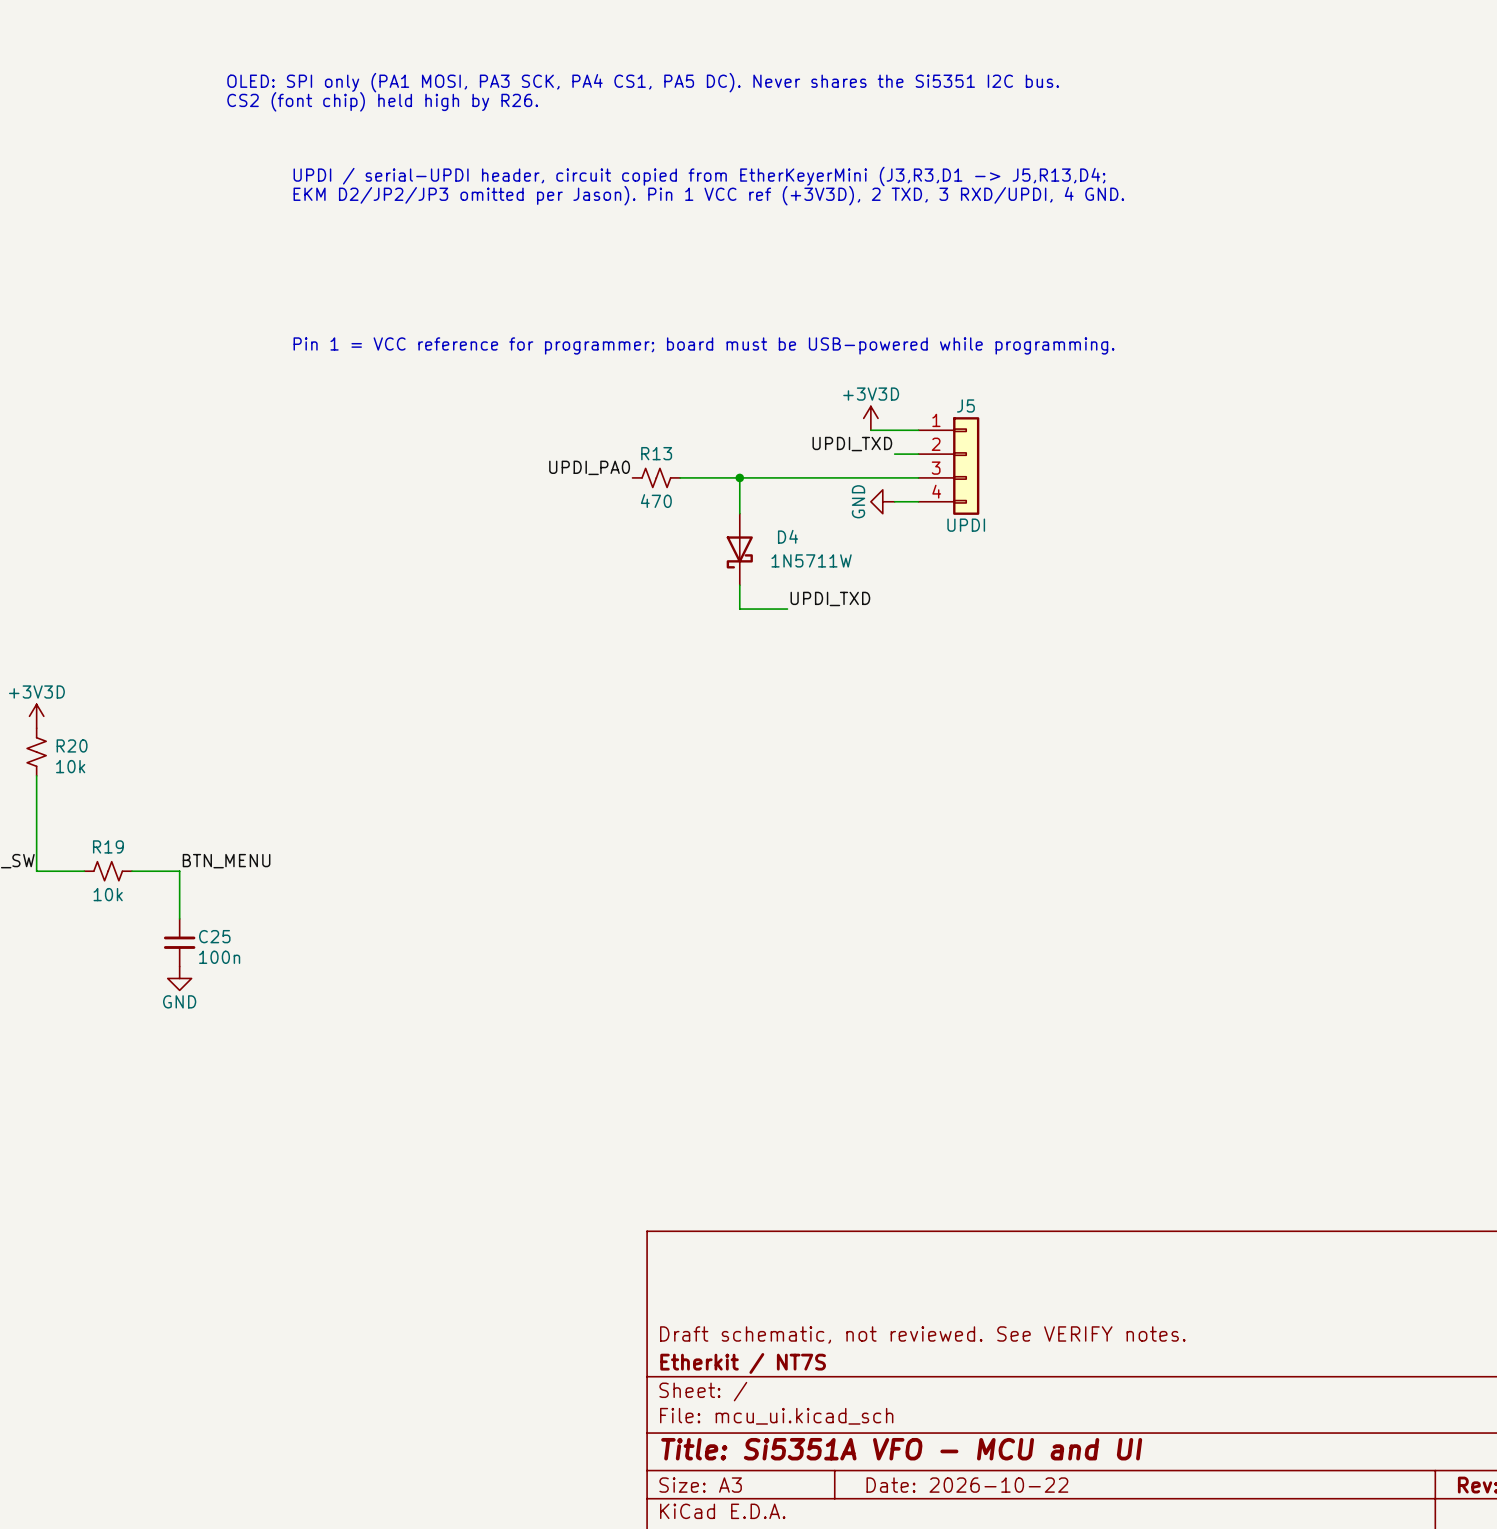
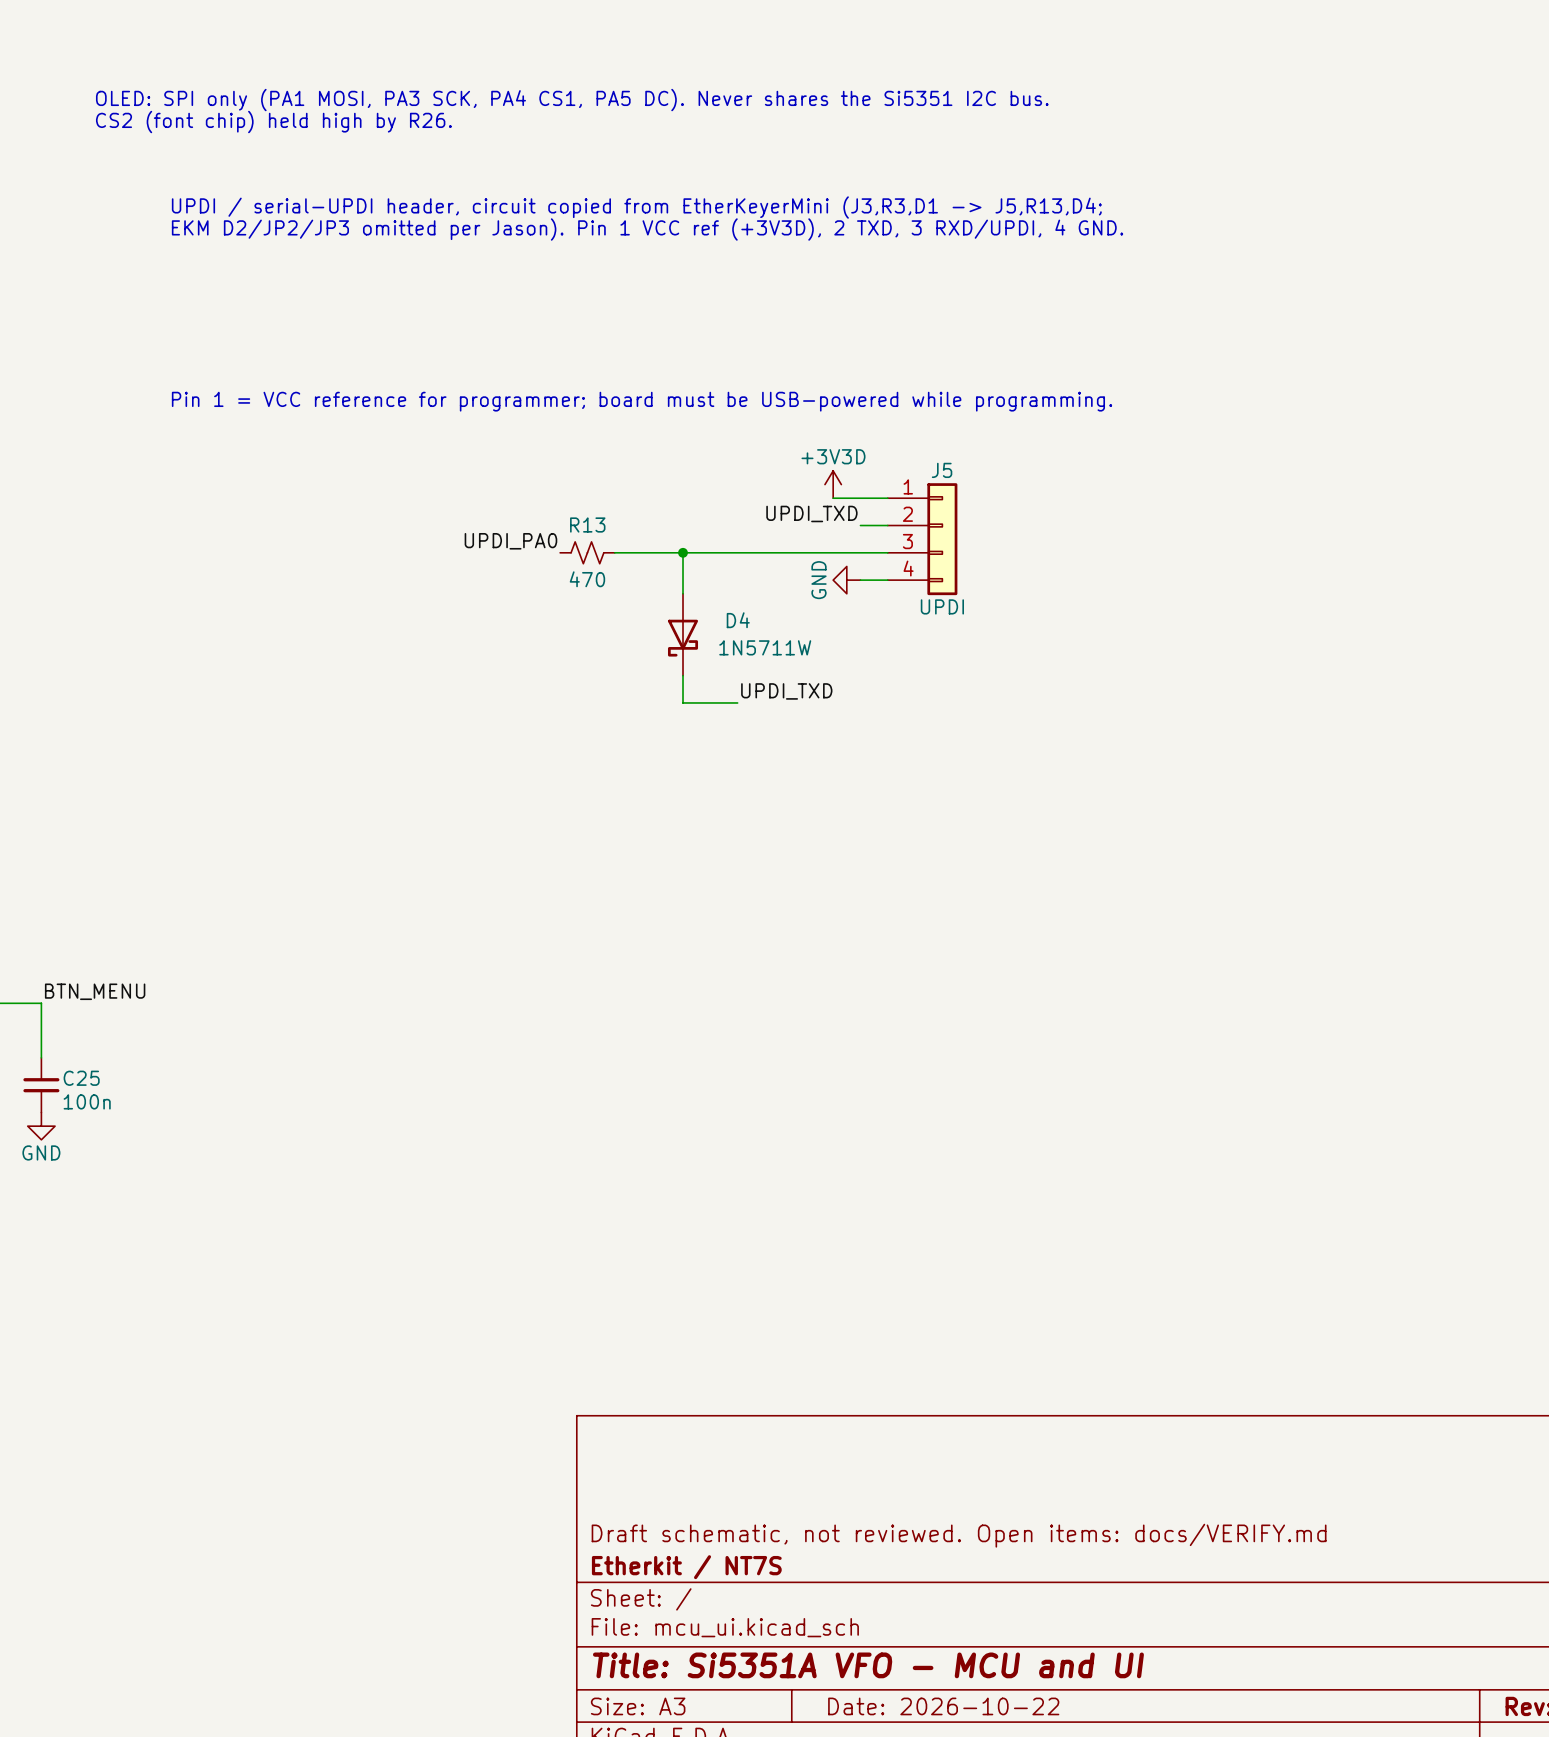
title block: Draft schematic, not reviewed. See VERIFY notes. (922, 1334) -> Draft schematic, not reviewed. Open items: docs/VERIFY.md (959, 1535)

